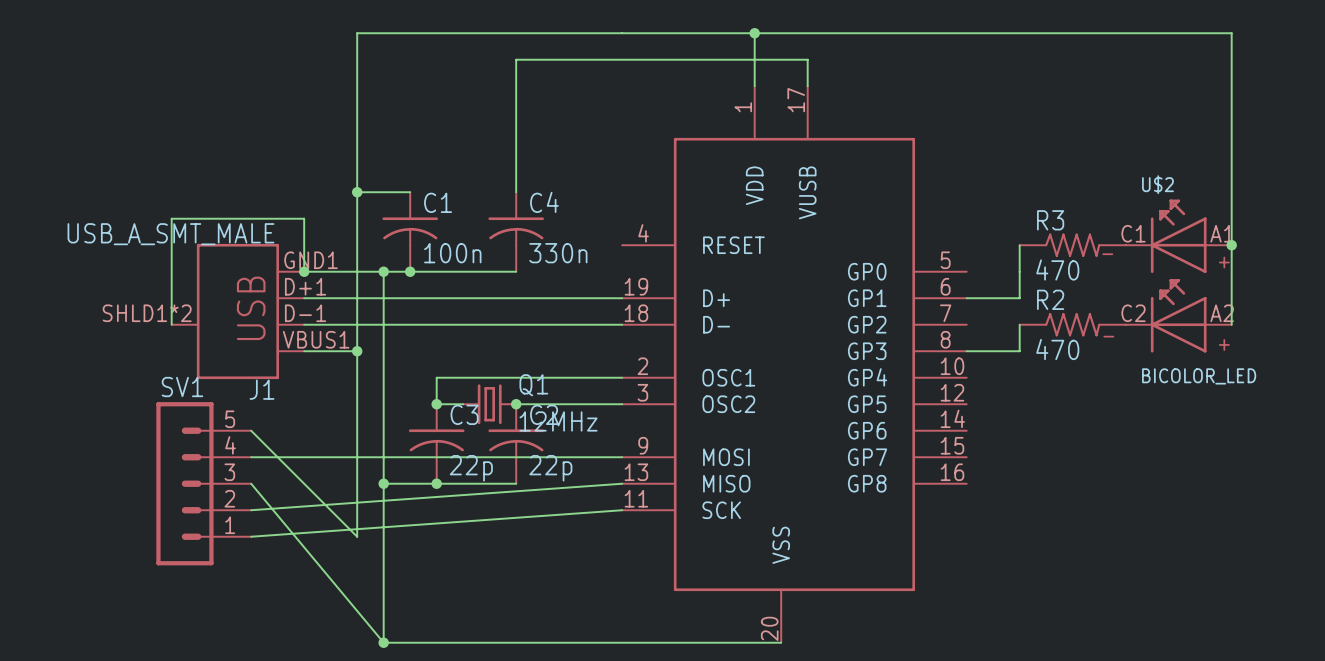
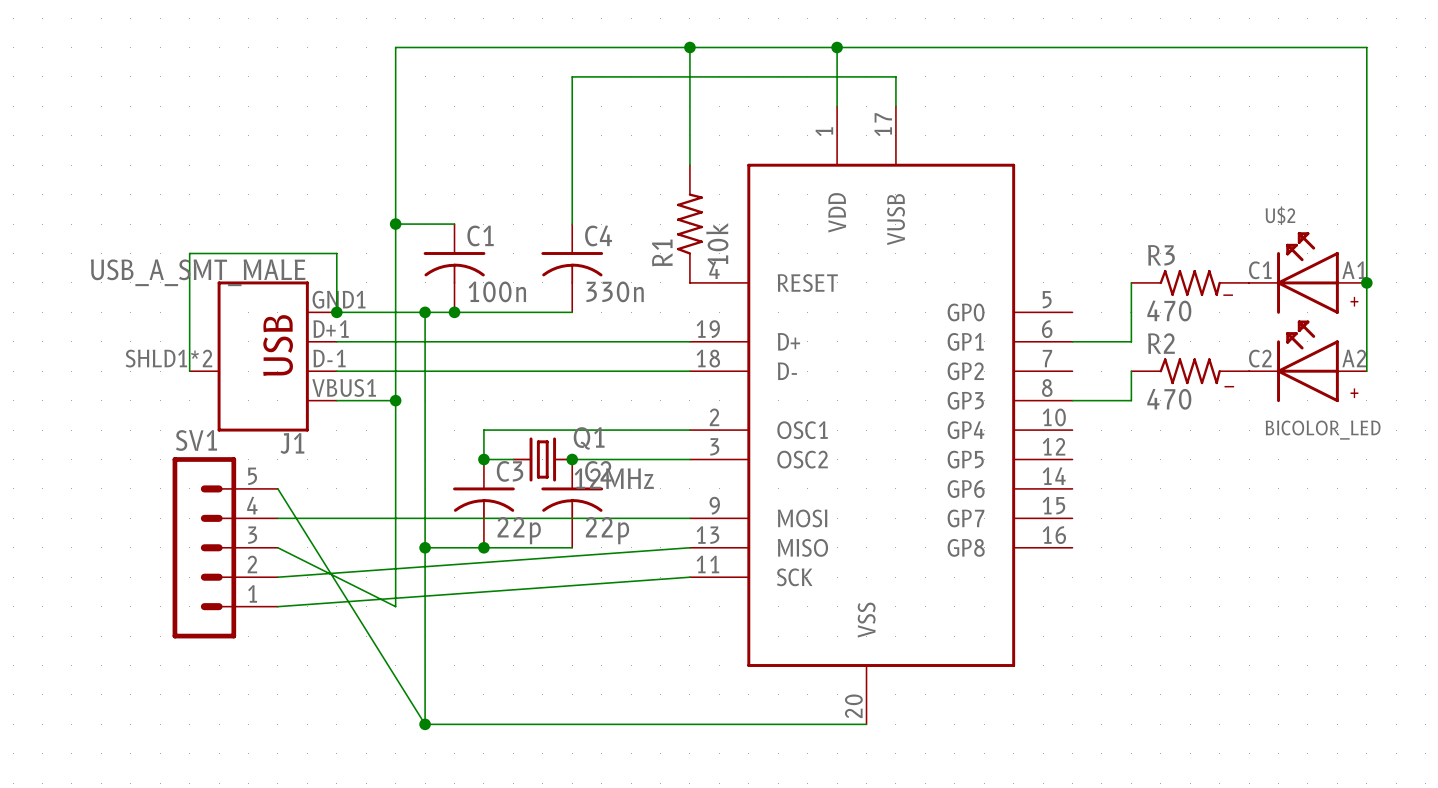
wire: none -> (689, 47) (689, 165)
junction: none -> (689, 47)
R1: none -> 10k (689, 224)
wire: (251, 430) (357, 536) -> (277, 547) (395, 606)
wire: (251, 483) (383, 642) -> (277, 488) (425, 724)

